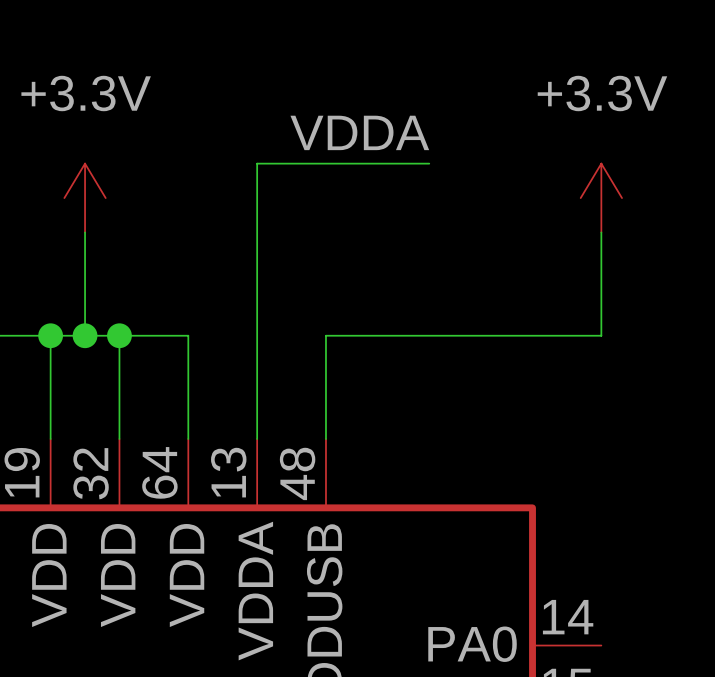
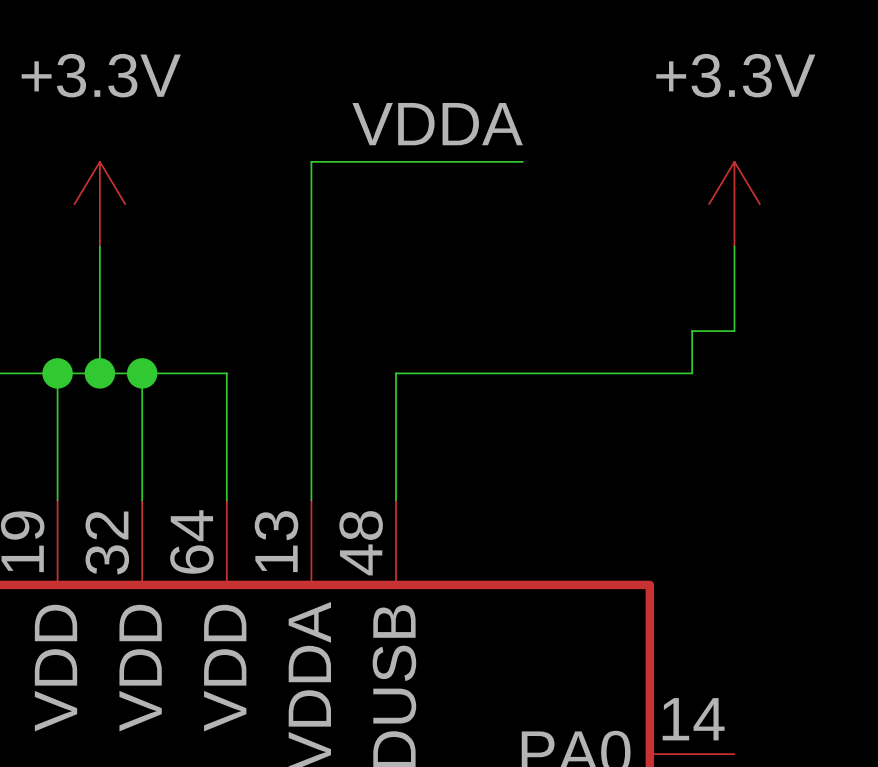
wire: (601, 301) (601, 335) (566, 335) -> (734, 331) (692, 331) (692, 373)

